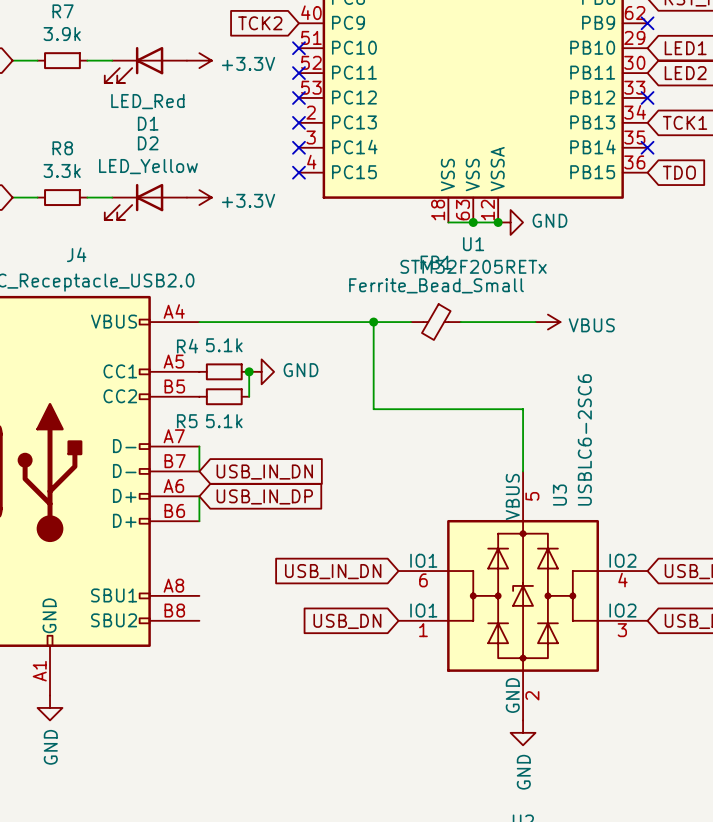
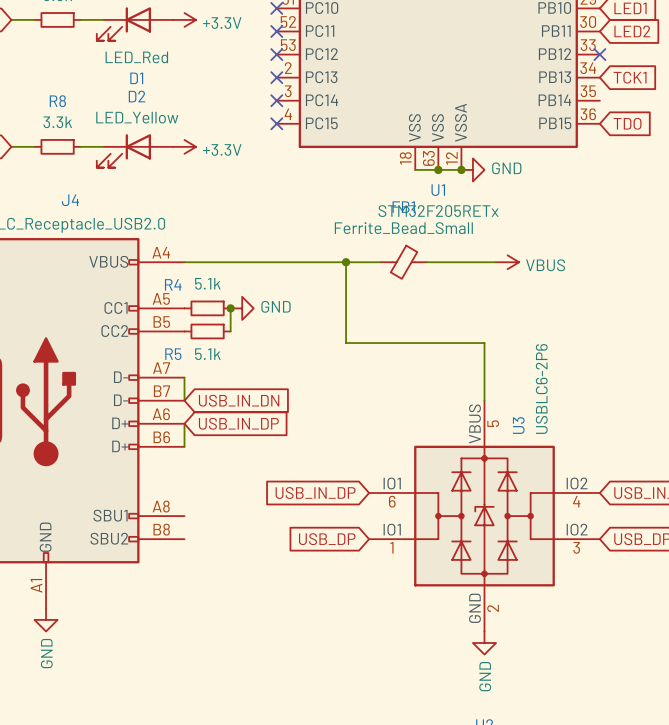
no-connect mark: (647, 147) -> none
U3 value: USBLC6-2SC6 (584, 439) -> USBLC6-2P6 (541, 388)
global label: USB_IN_DN (333, 571) -> USB_IN_DP (315, 493)
global label: USB_DN (347, 621) -> USB_DP (327, 539)

